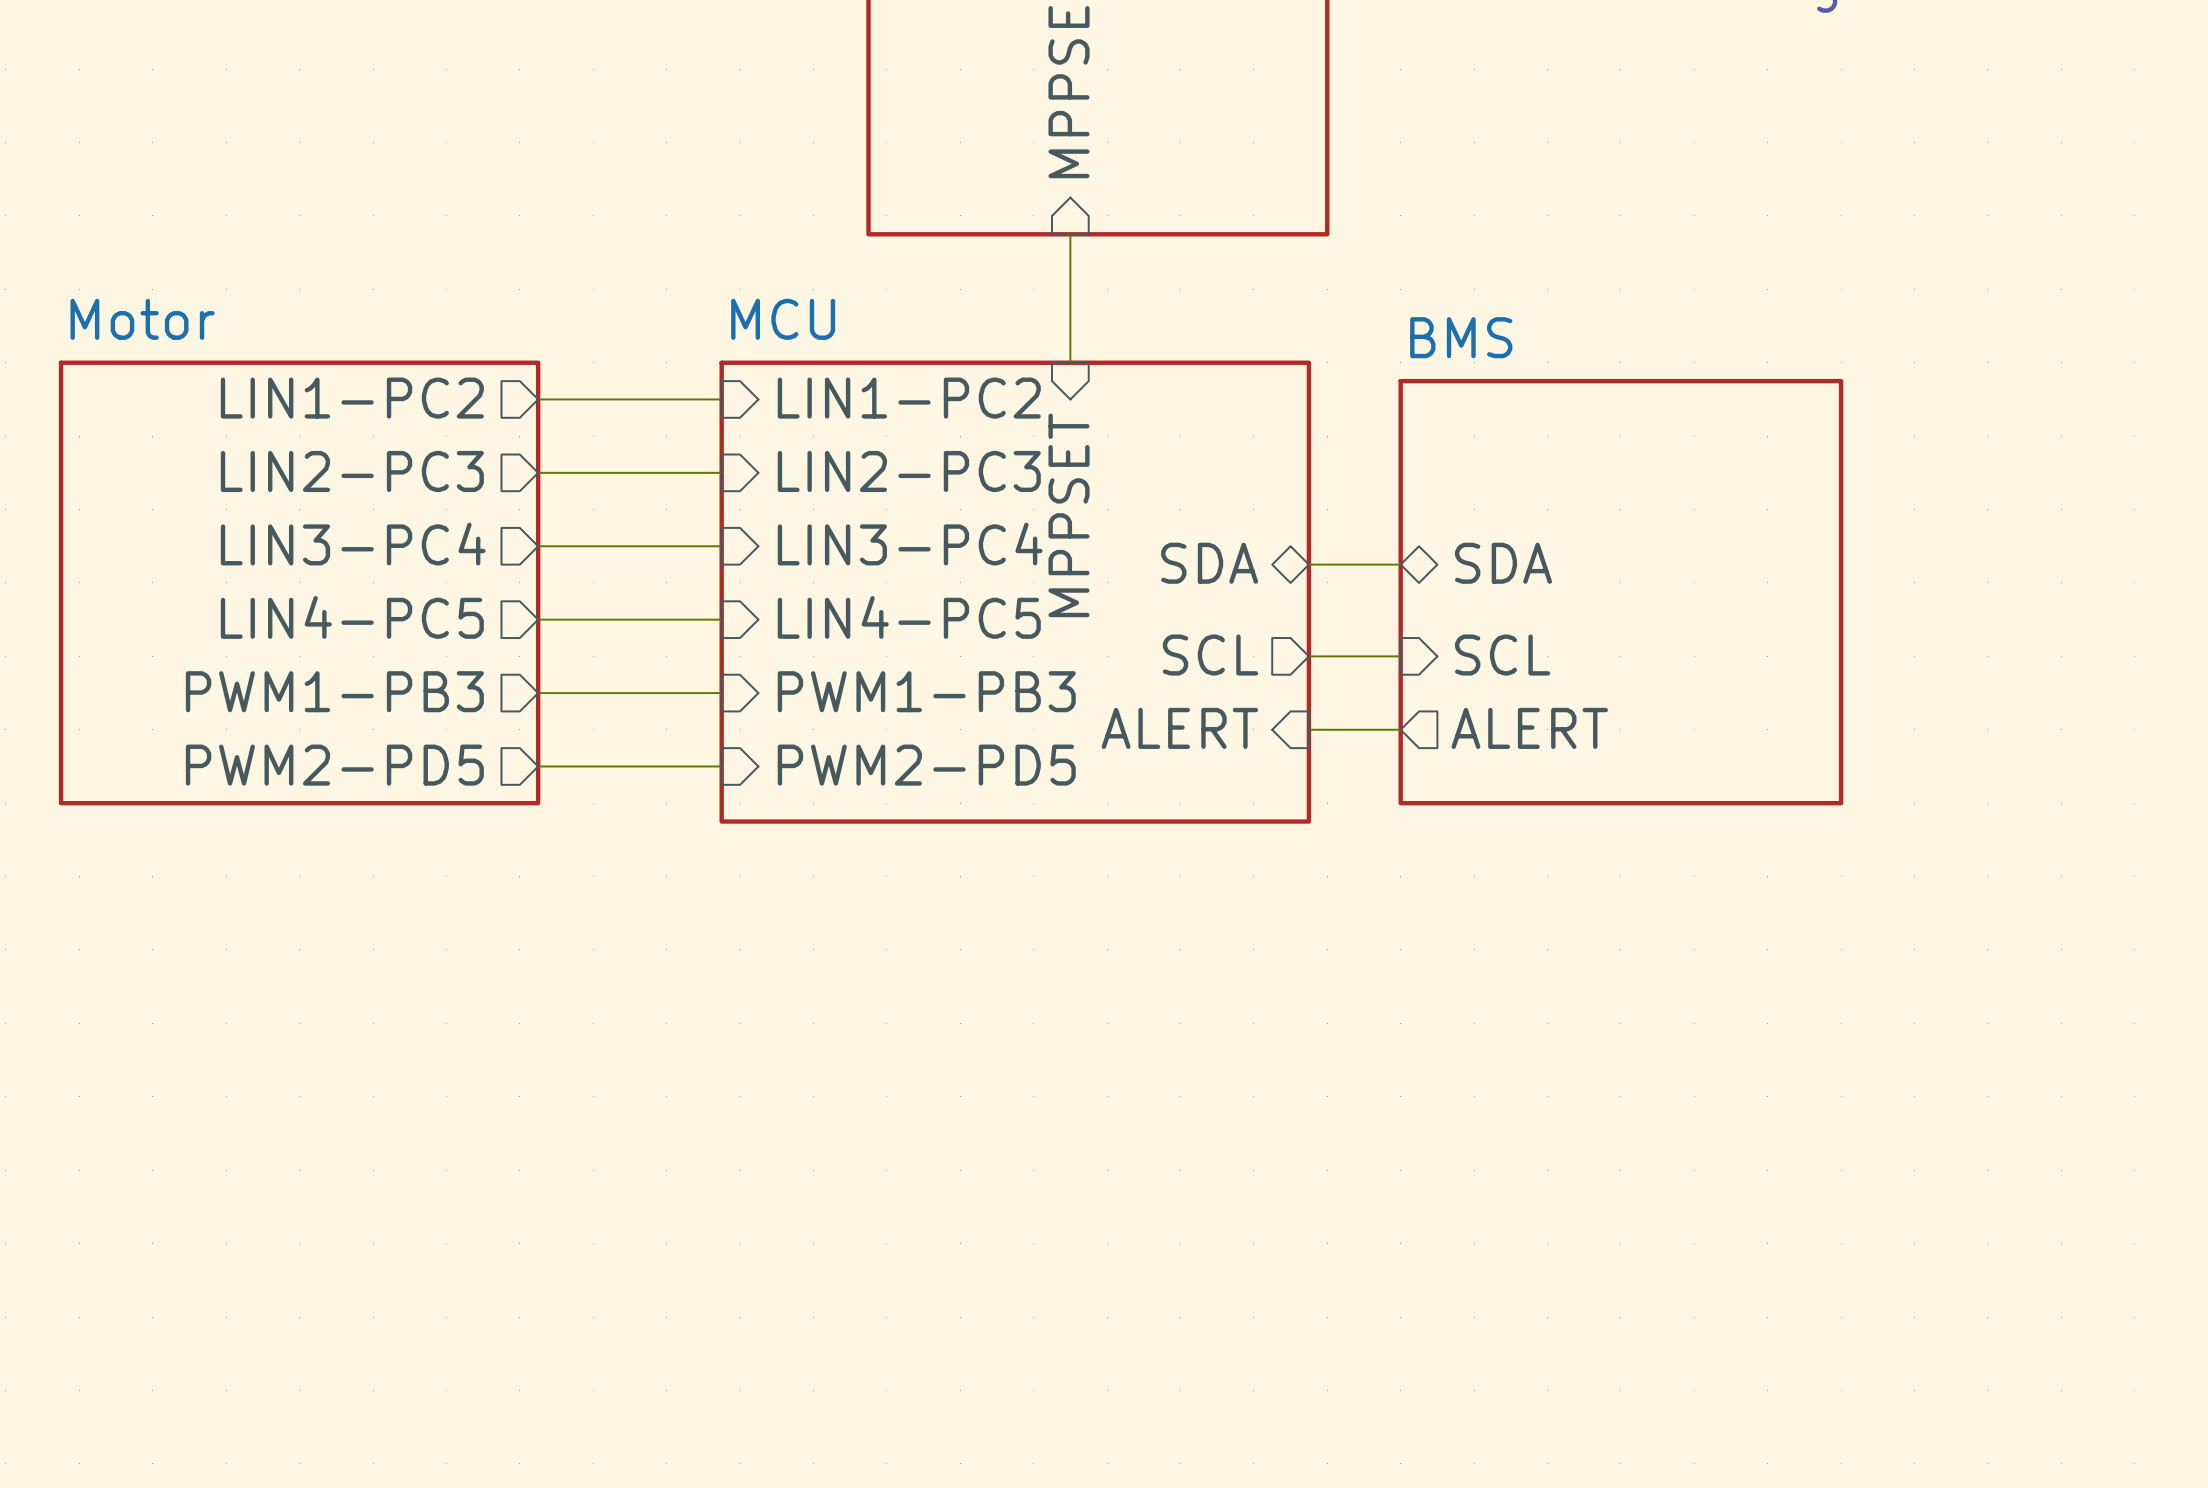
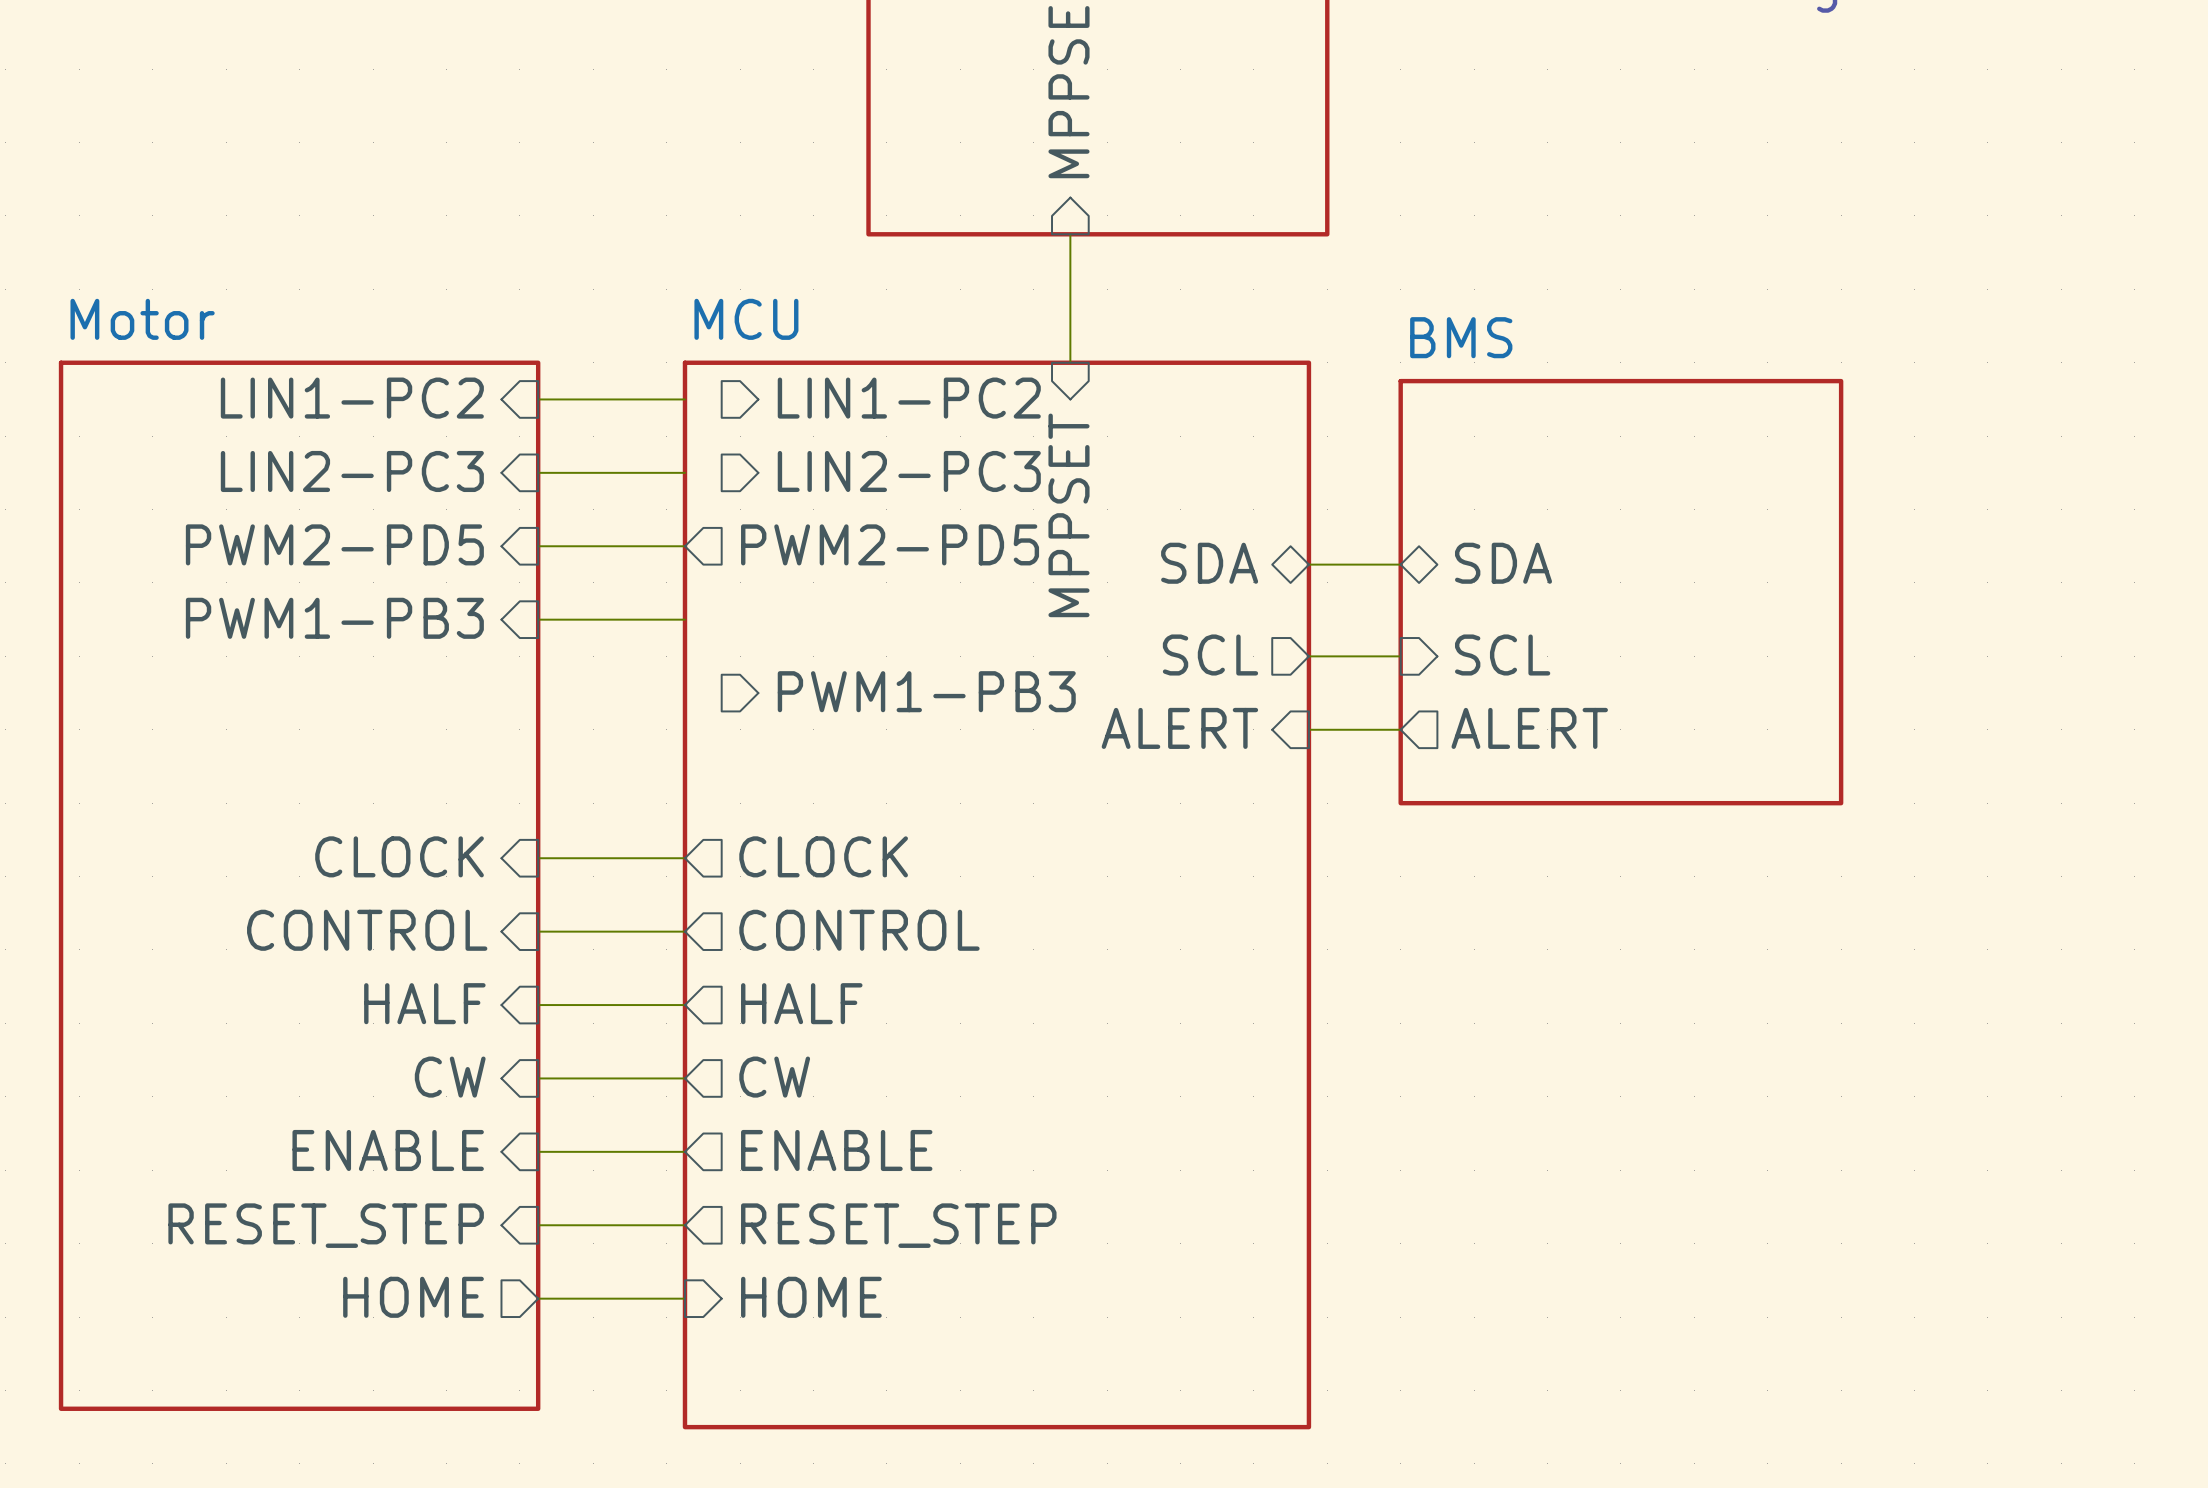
sheet pin shape: output (352, 398) -> input (352, 398)
wire: (684, 399) (721, 399) -> none
sheet pin shape: output (352, 471) -> input (352, 471)
wire: (684, 472) (721, 472) -> none
sheet pin shape: output (353, 544) -> input (334, 544)
sheet pin: LIN3-PC4 (353, 544) -> PWM2-PD5 (334, 544)
sheet pin: none -> PWM2-PD5 (890, 544)
sheet pin: LIN3-PC4 (910, 544) -> none
wire: (684, 546) (721, 546) -> none
sheet Motor: (299, 582) -> none
sheet MCU: (1015, 592) -> none
sheet pin shape: output (352, 617) -> input (334, 618)
sheet pin: LIN4-PC5 (352, 617) -> PWM1-PB3 (334, 618)
sheet pin: LIN4-PC5 (909, 617) -> none
wire: (684, 619) (721, 619) -> none
sheet pin: PWM1-PB3 (334, 691) -> none
wire: (538, 693) (721, 693) -> none
sheet pin: PWM2-PD5 (334, 765) -> none
sheet pin: PWM2-PD5 (926, 765) -> none
wire: (538, 766) (721, 766) -> none
sheet pin: none -> CLOCK (399, 856)
sheet pin: none -> CLOCK (823, 856)
wire: none -> (538, 858) (684, 858)
sheet Motor: none -> (299, 885)
sheet MCU: none -> (996, 894)
sheet pin: none -> CONTROL (367, 930)
sheet pin: none -> CONTROL (859, 930)
wire: none -> (538, 931) (684, 931)
sheet pin: none -> HALF (424, 1003)
sheet pin: none -> HALF (801, 1003)
wire: none -> (538, 1005) (684, 1005)
sheet pin: none -> CW (450, 1077)
sheet pin: none -> CW (774, 1077)
wire: none -> (538, 1078) (684, 1078)
sheet pin: none -> ENABLE (388, 1150)
sheet pin: none -> ENABLE (836, 1150)
wire: none -> (538, 1151) (684, 1151)
sheet pin: none -> RESET_STEP (326, 1225)
wire: none -> (538, 1225) (684, 1225)
sheet pin: none -> RESET_STEP (898, 1225)
sheet pin: none -> HOME (413, 1297)
sheet pin: none -> HOME (811, 1297)
wire: none -> (538, 1298) (684, 1298)

